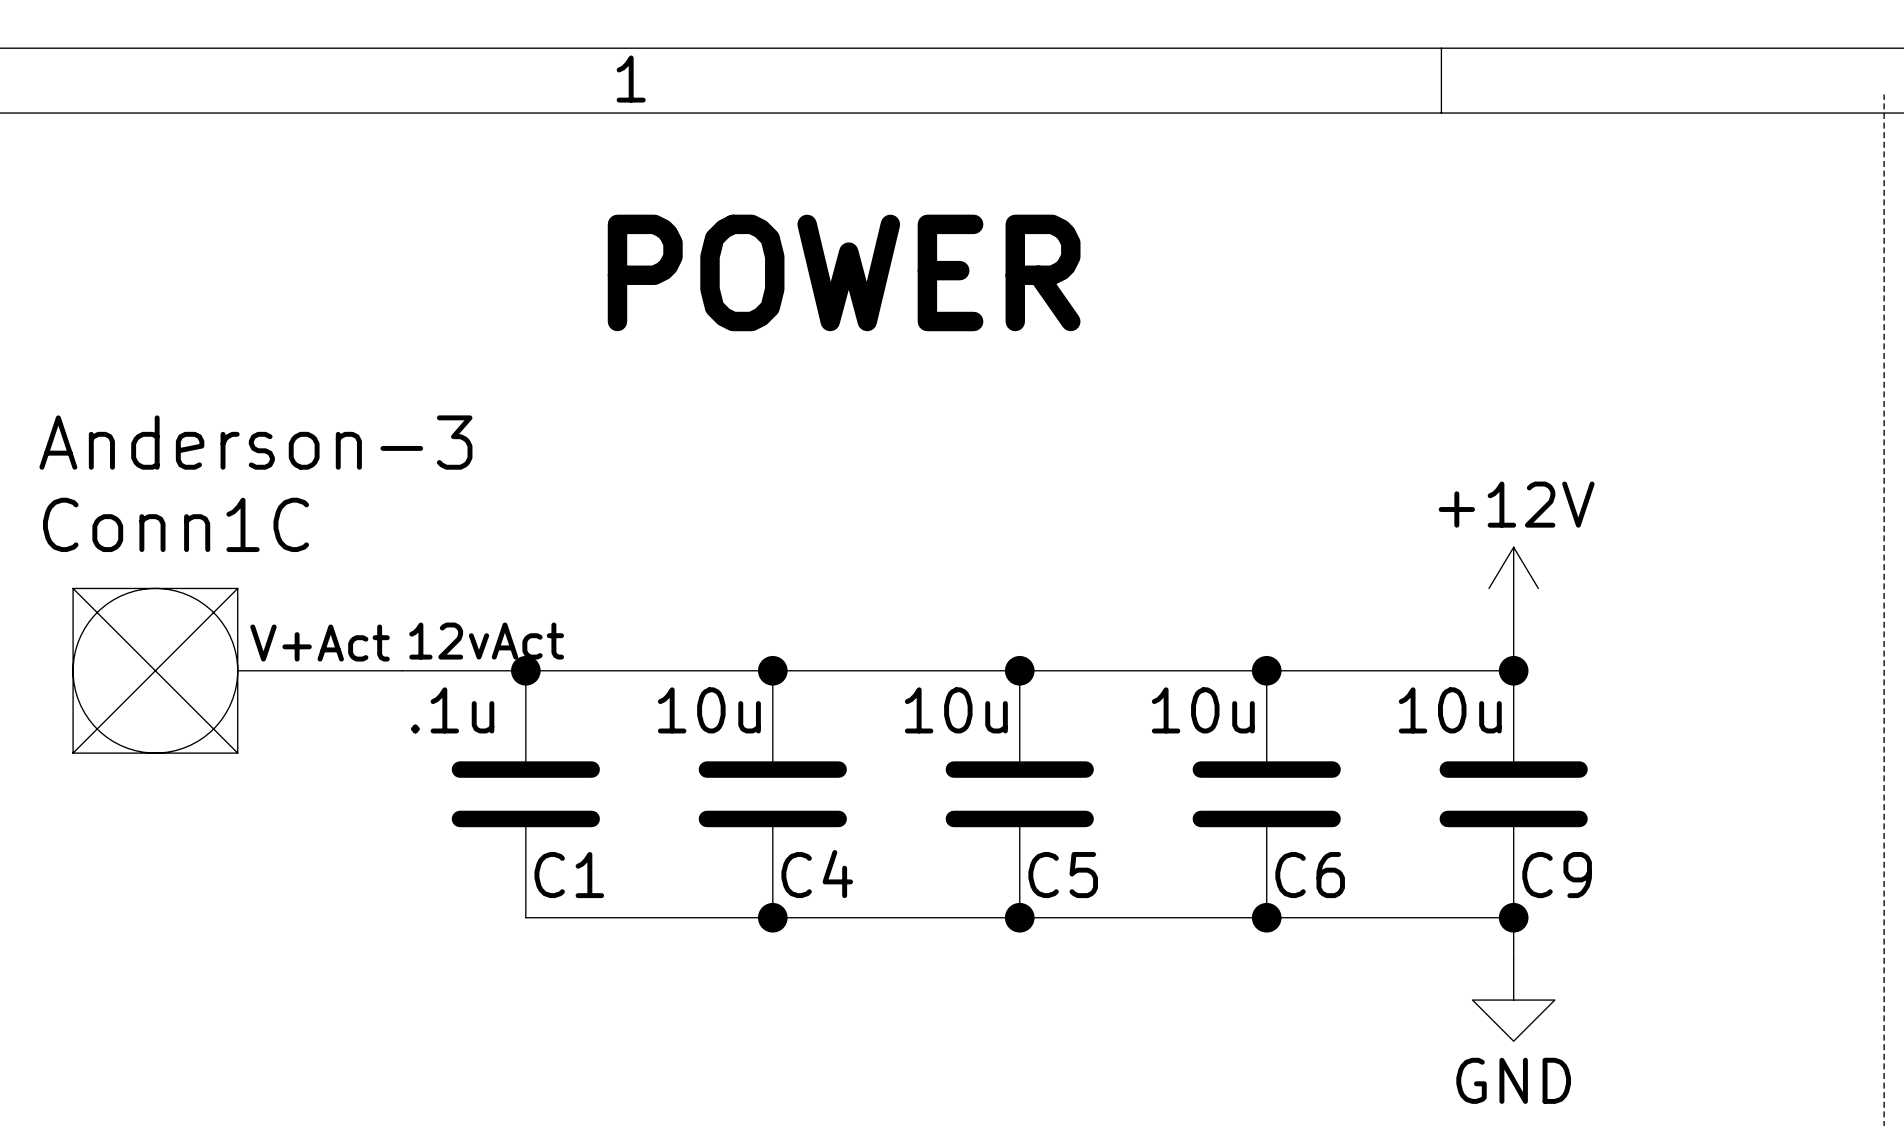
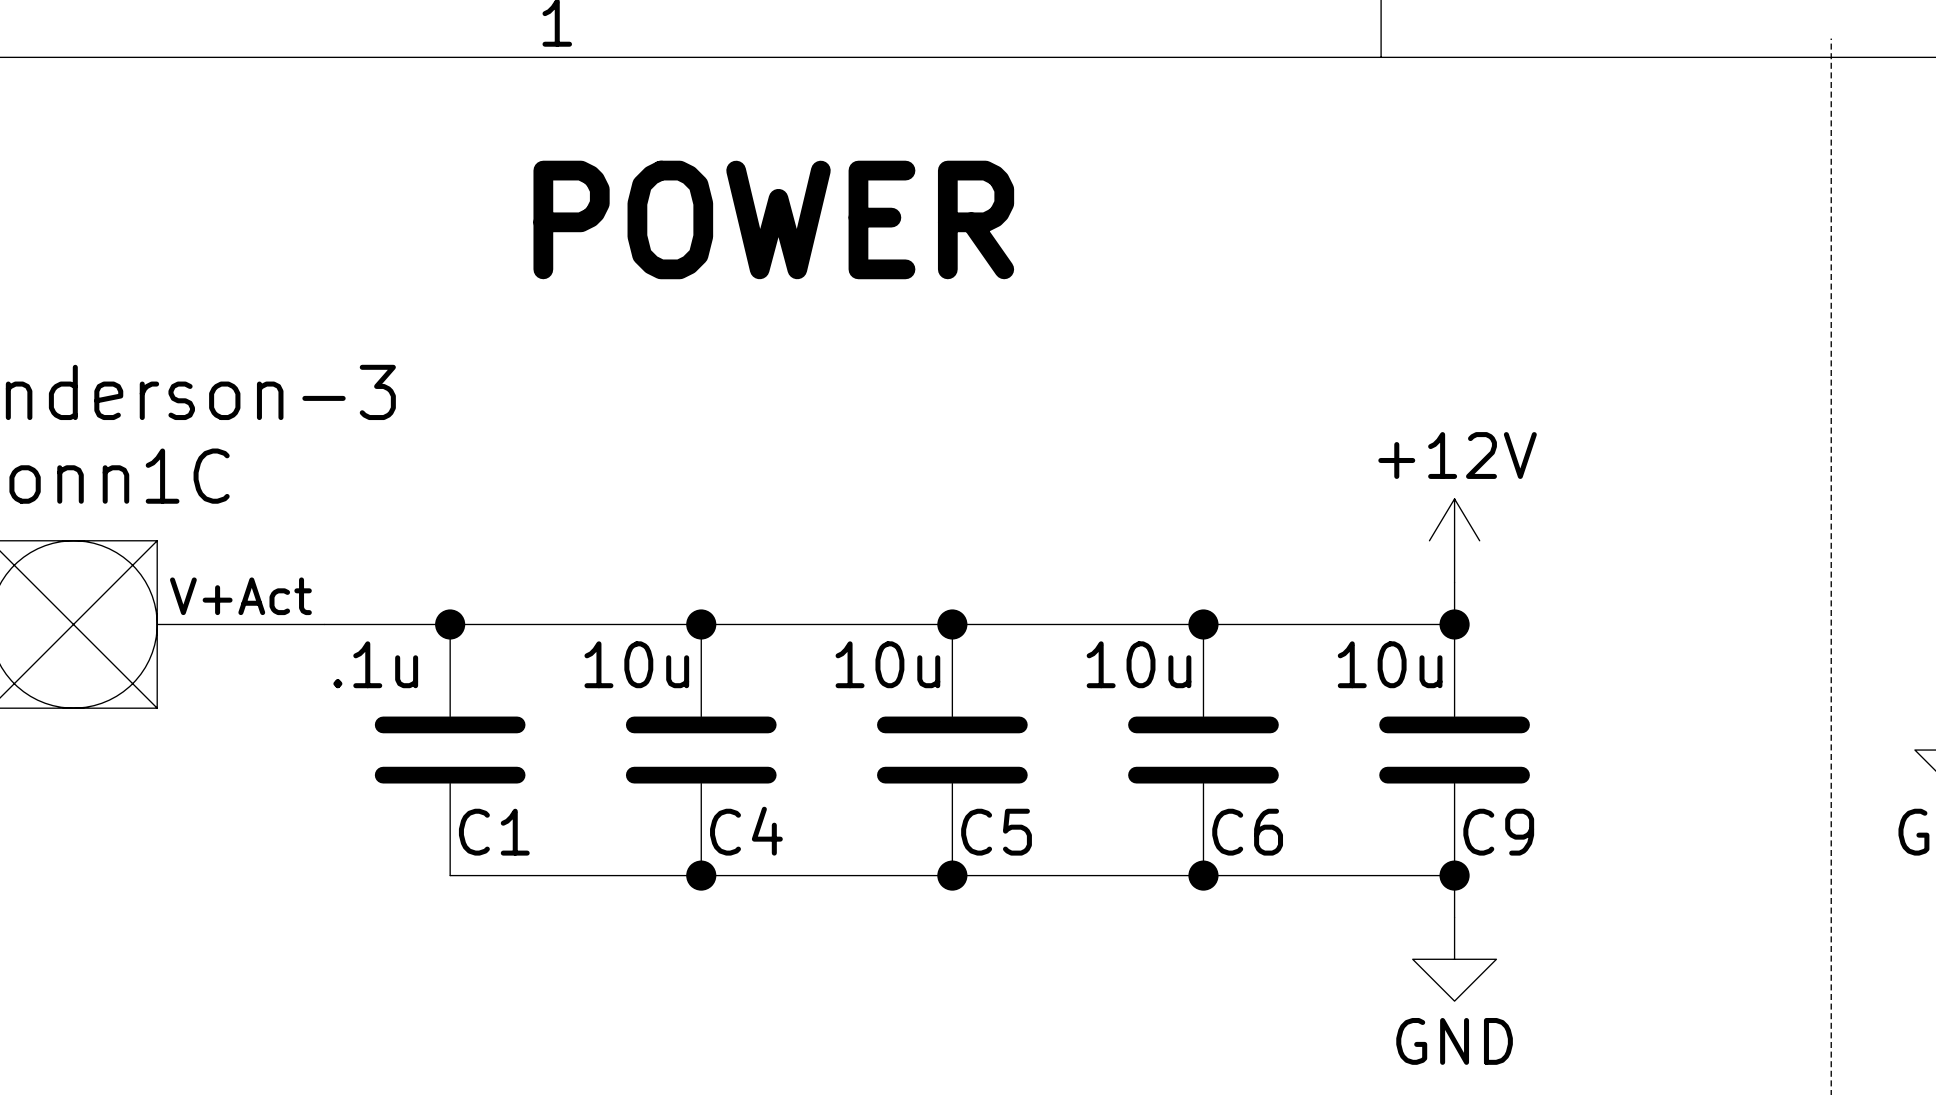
label: 12vAct (486, 641) -> none

